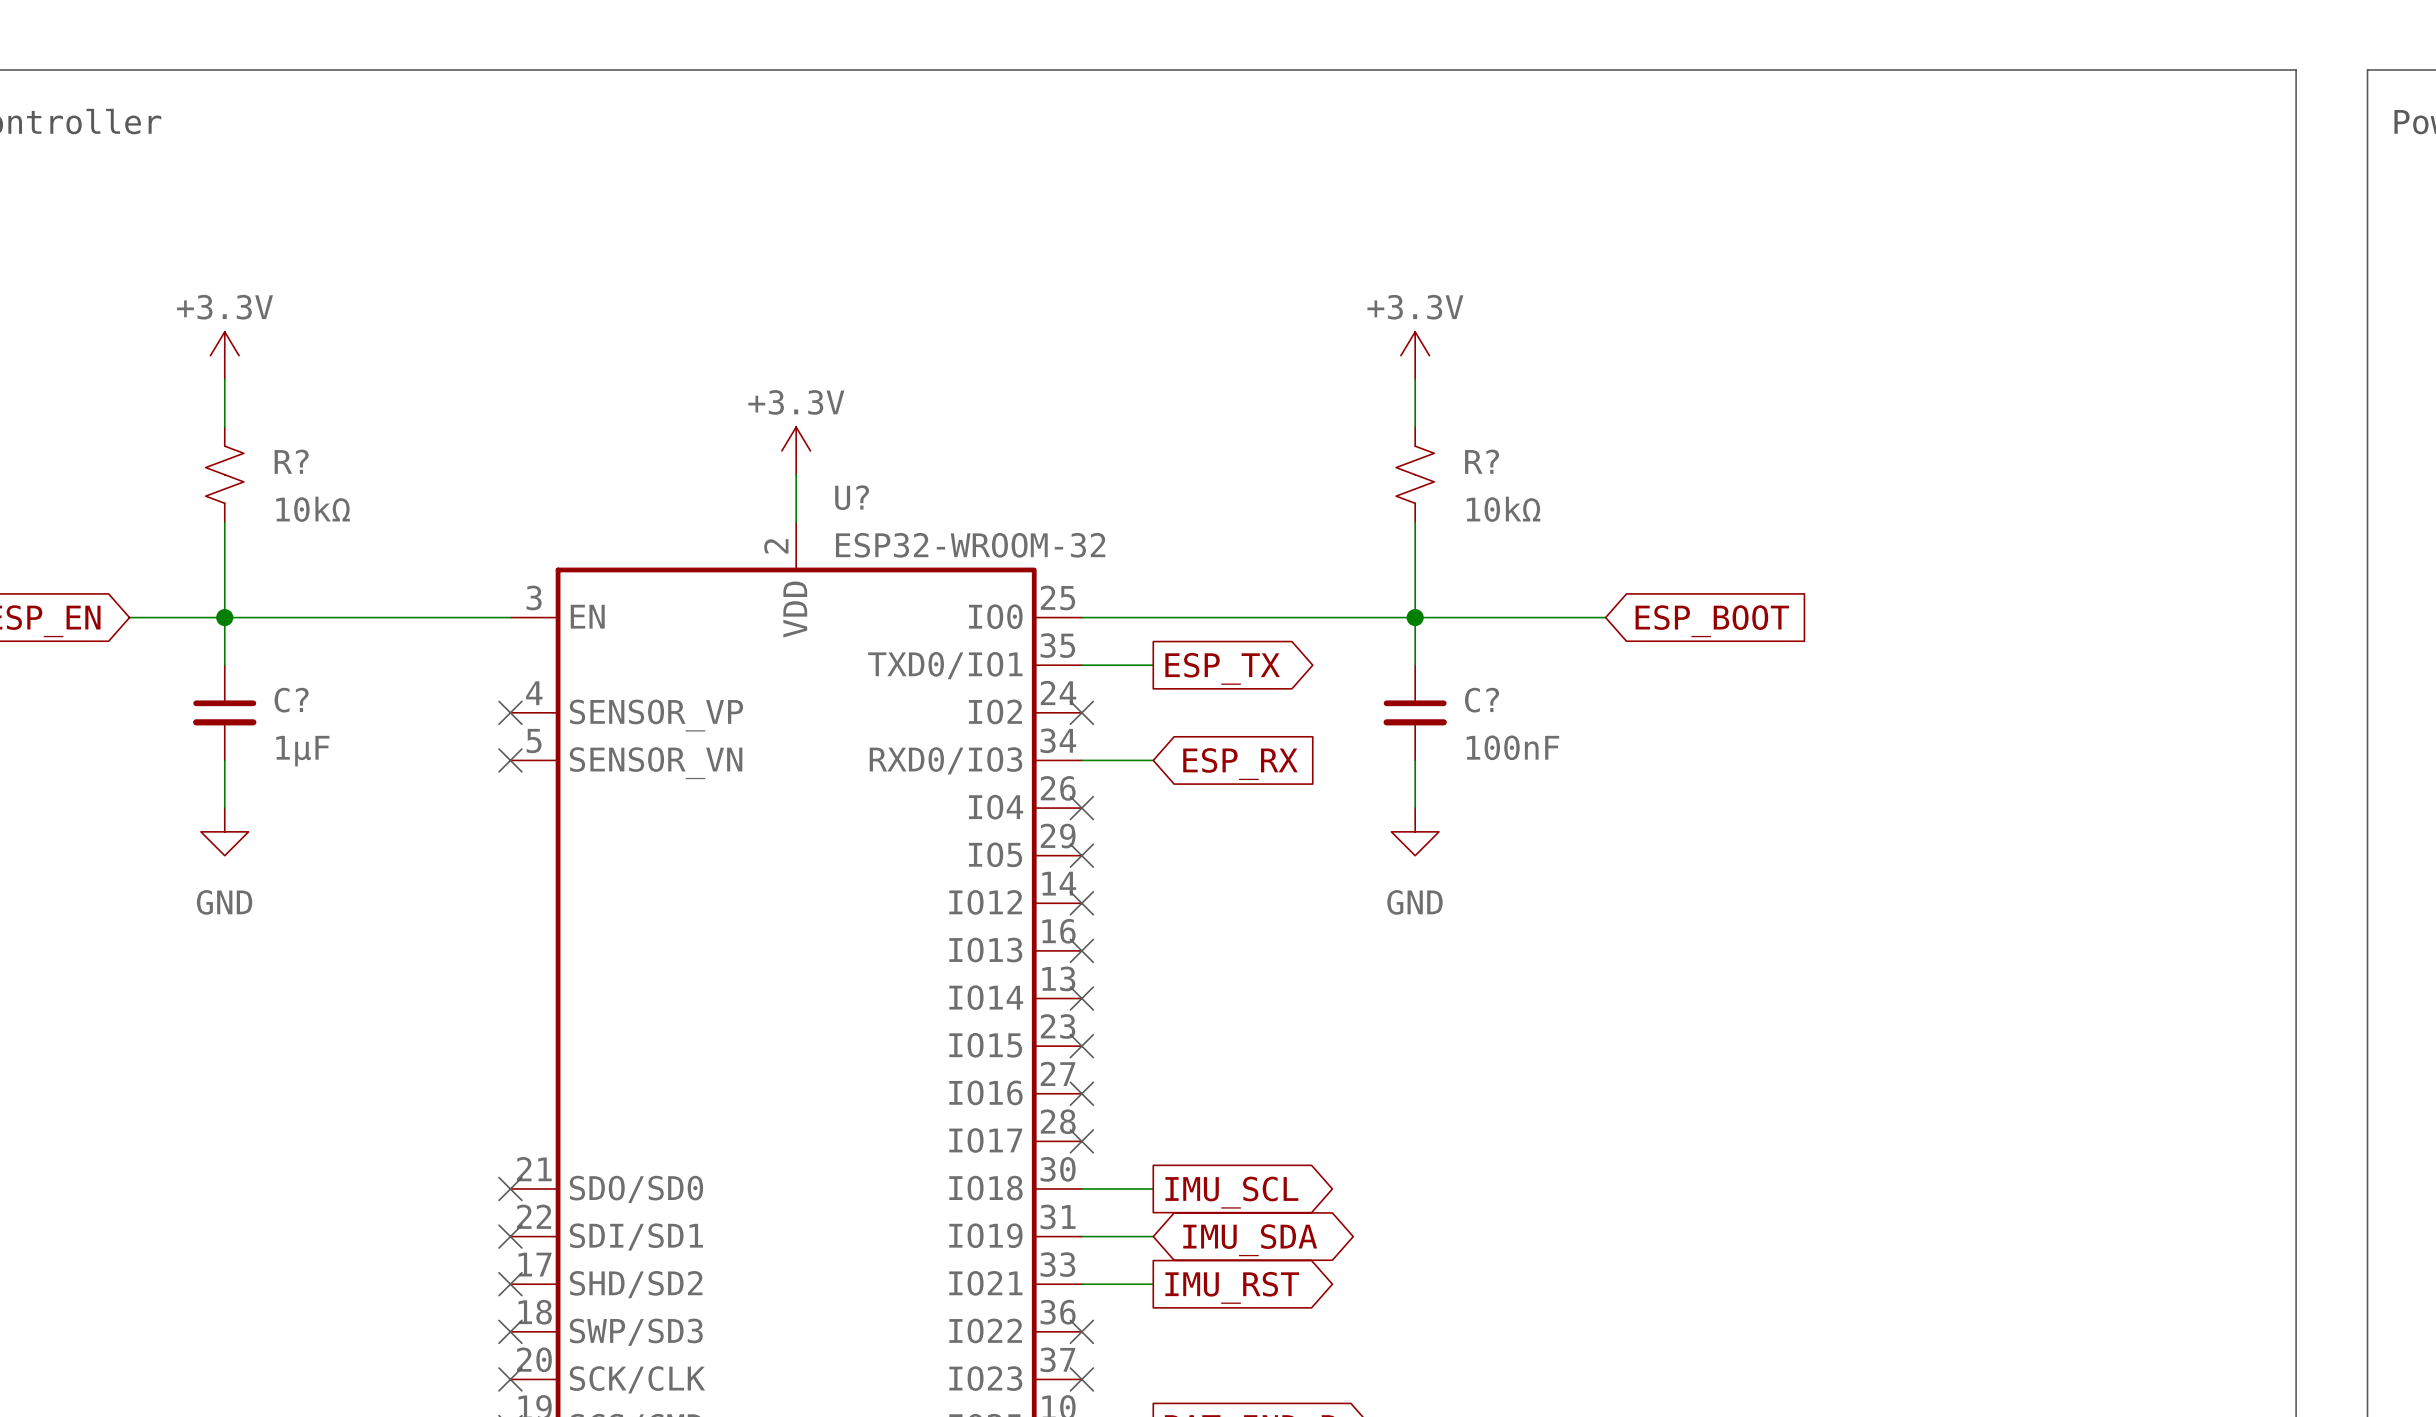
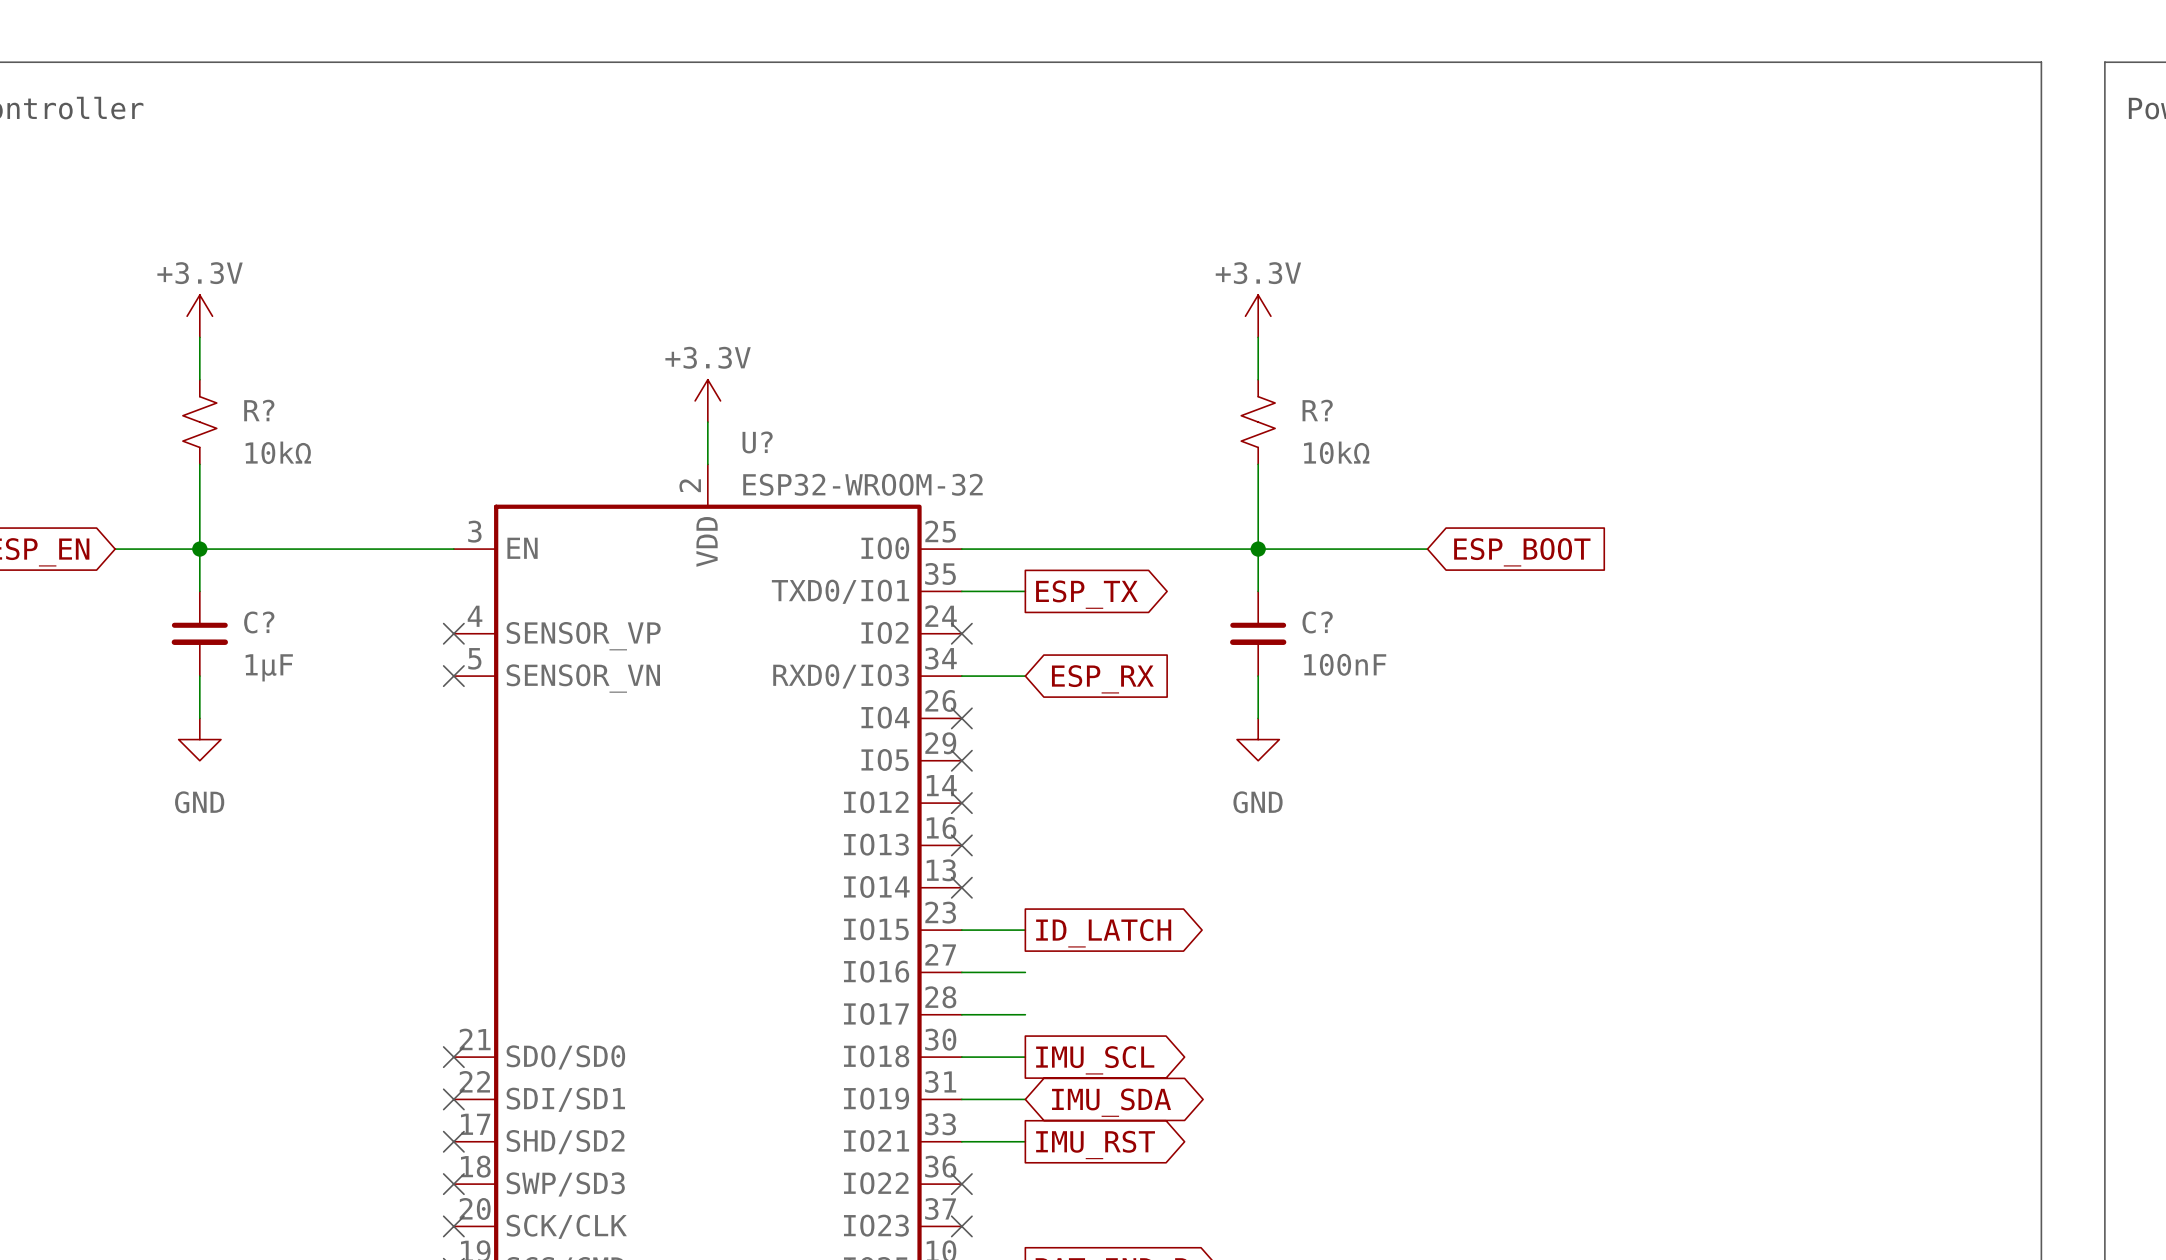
wire: none -> (961, 930) (1025, 930)
no-connect mark: (1081, 1046) -> none
global label: none -> ID_LATCH (1103, 933)
wire: none -> (961, 972) (1025, 972)
no-connect mark: (1081, 1093) -> none
wire: none -> (961, 1014) (1025, 1014)
no-connect mark: (1081, 1141) -> none

